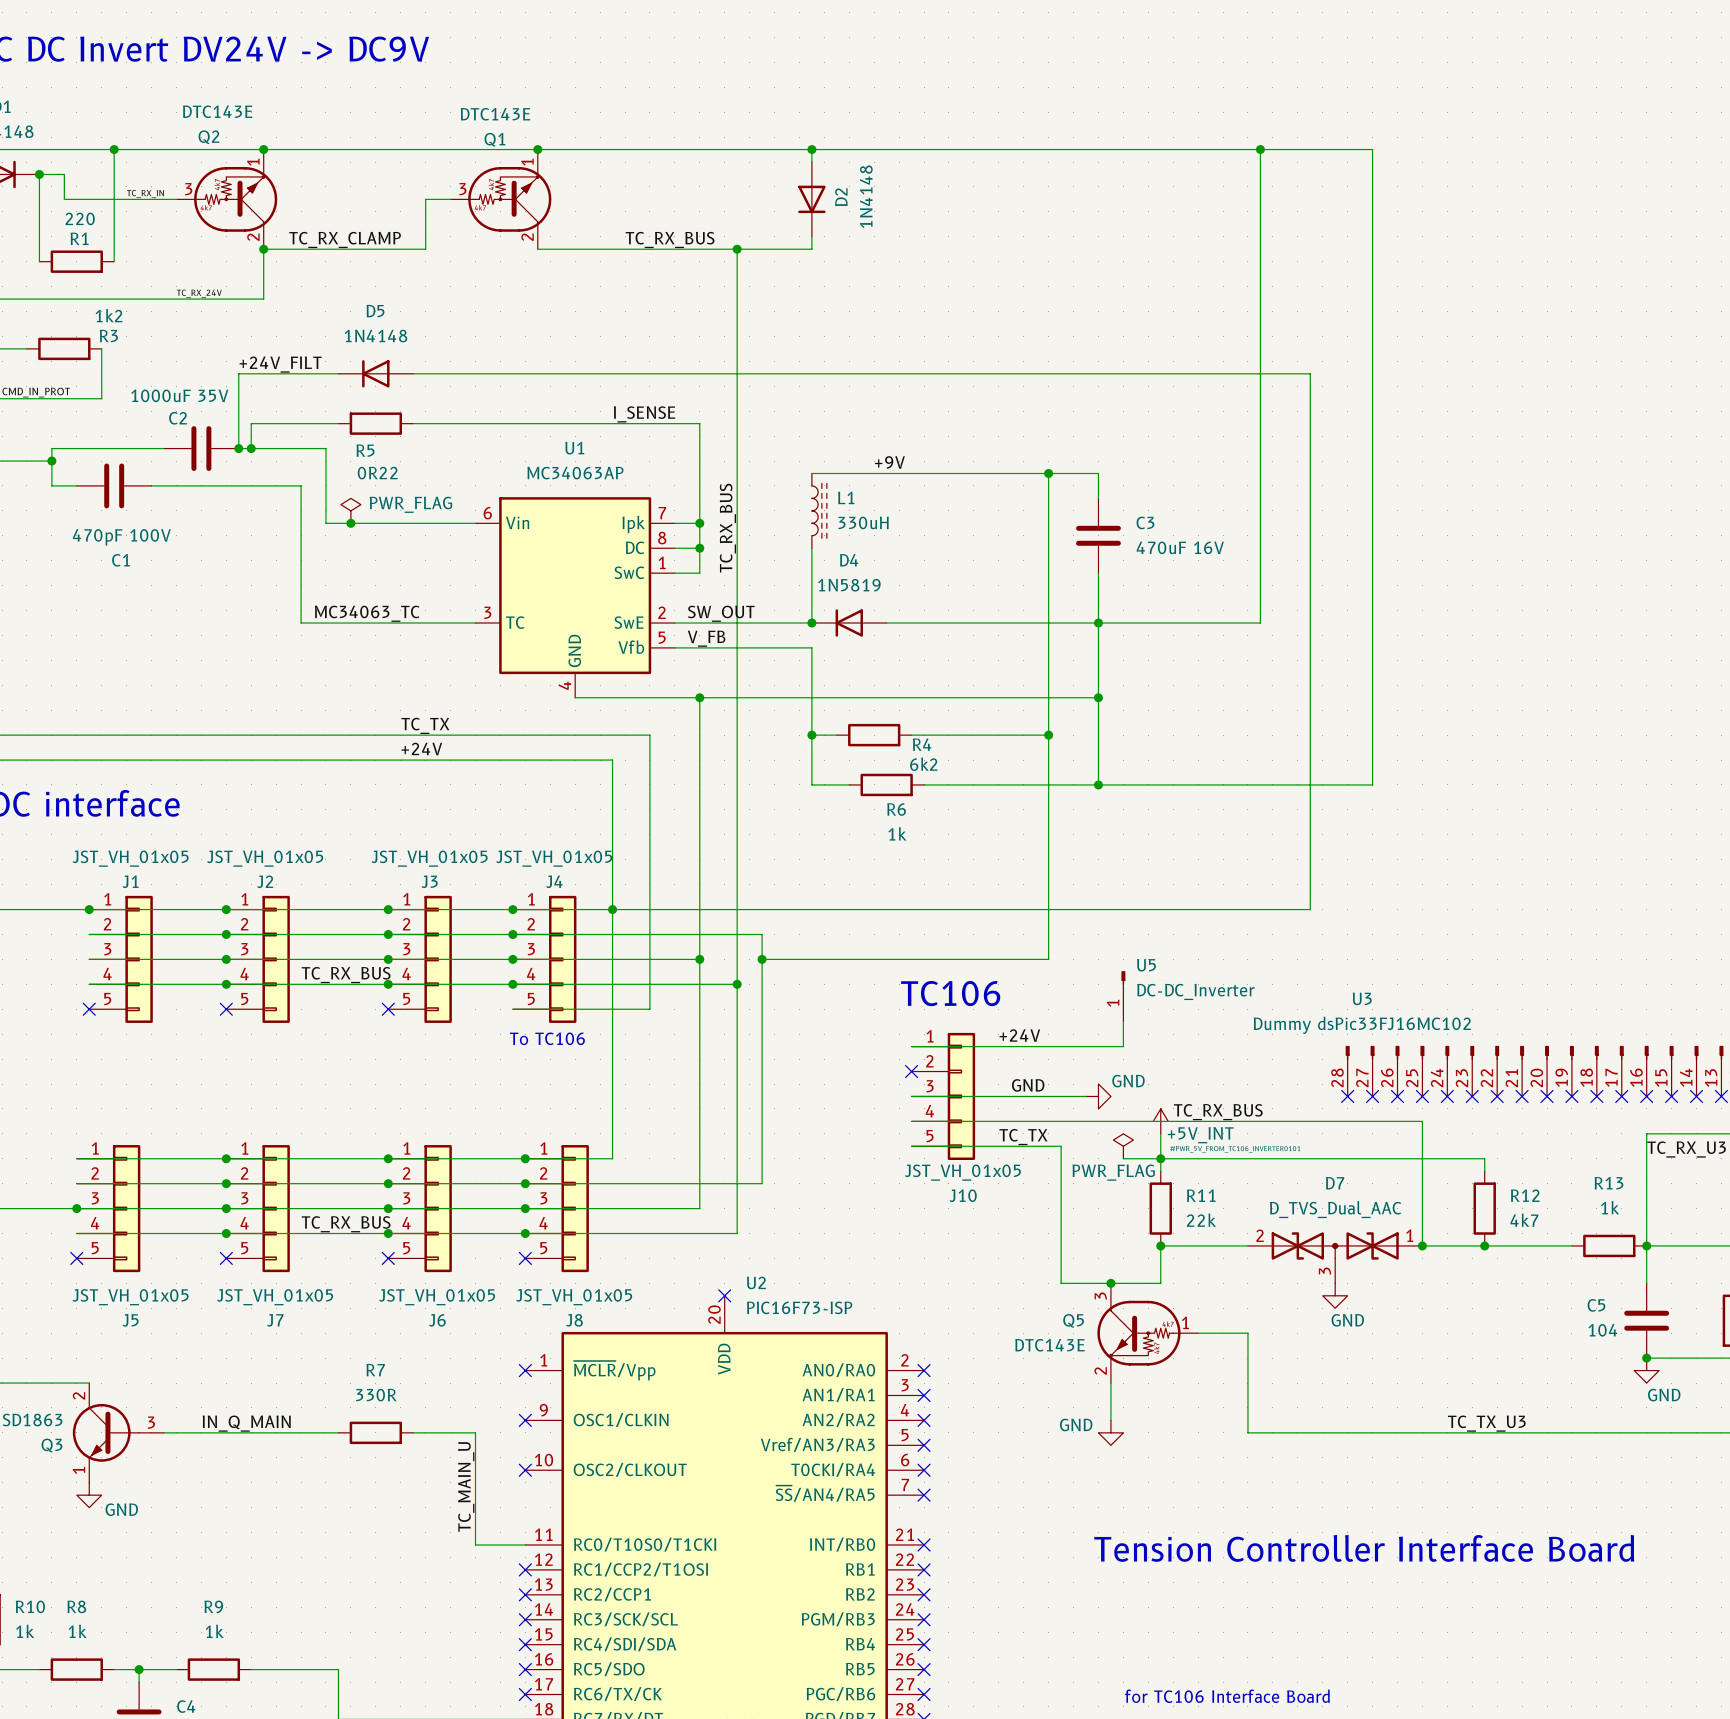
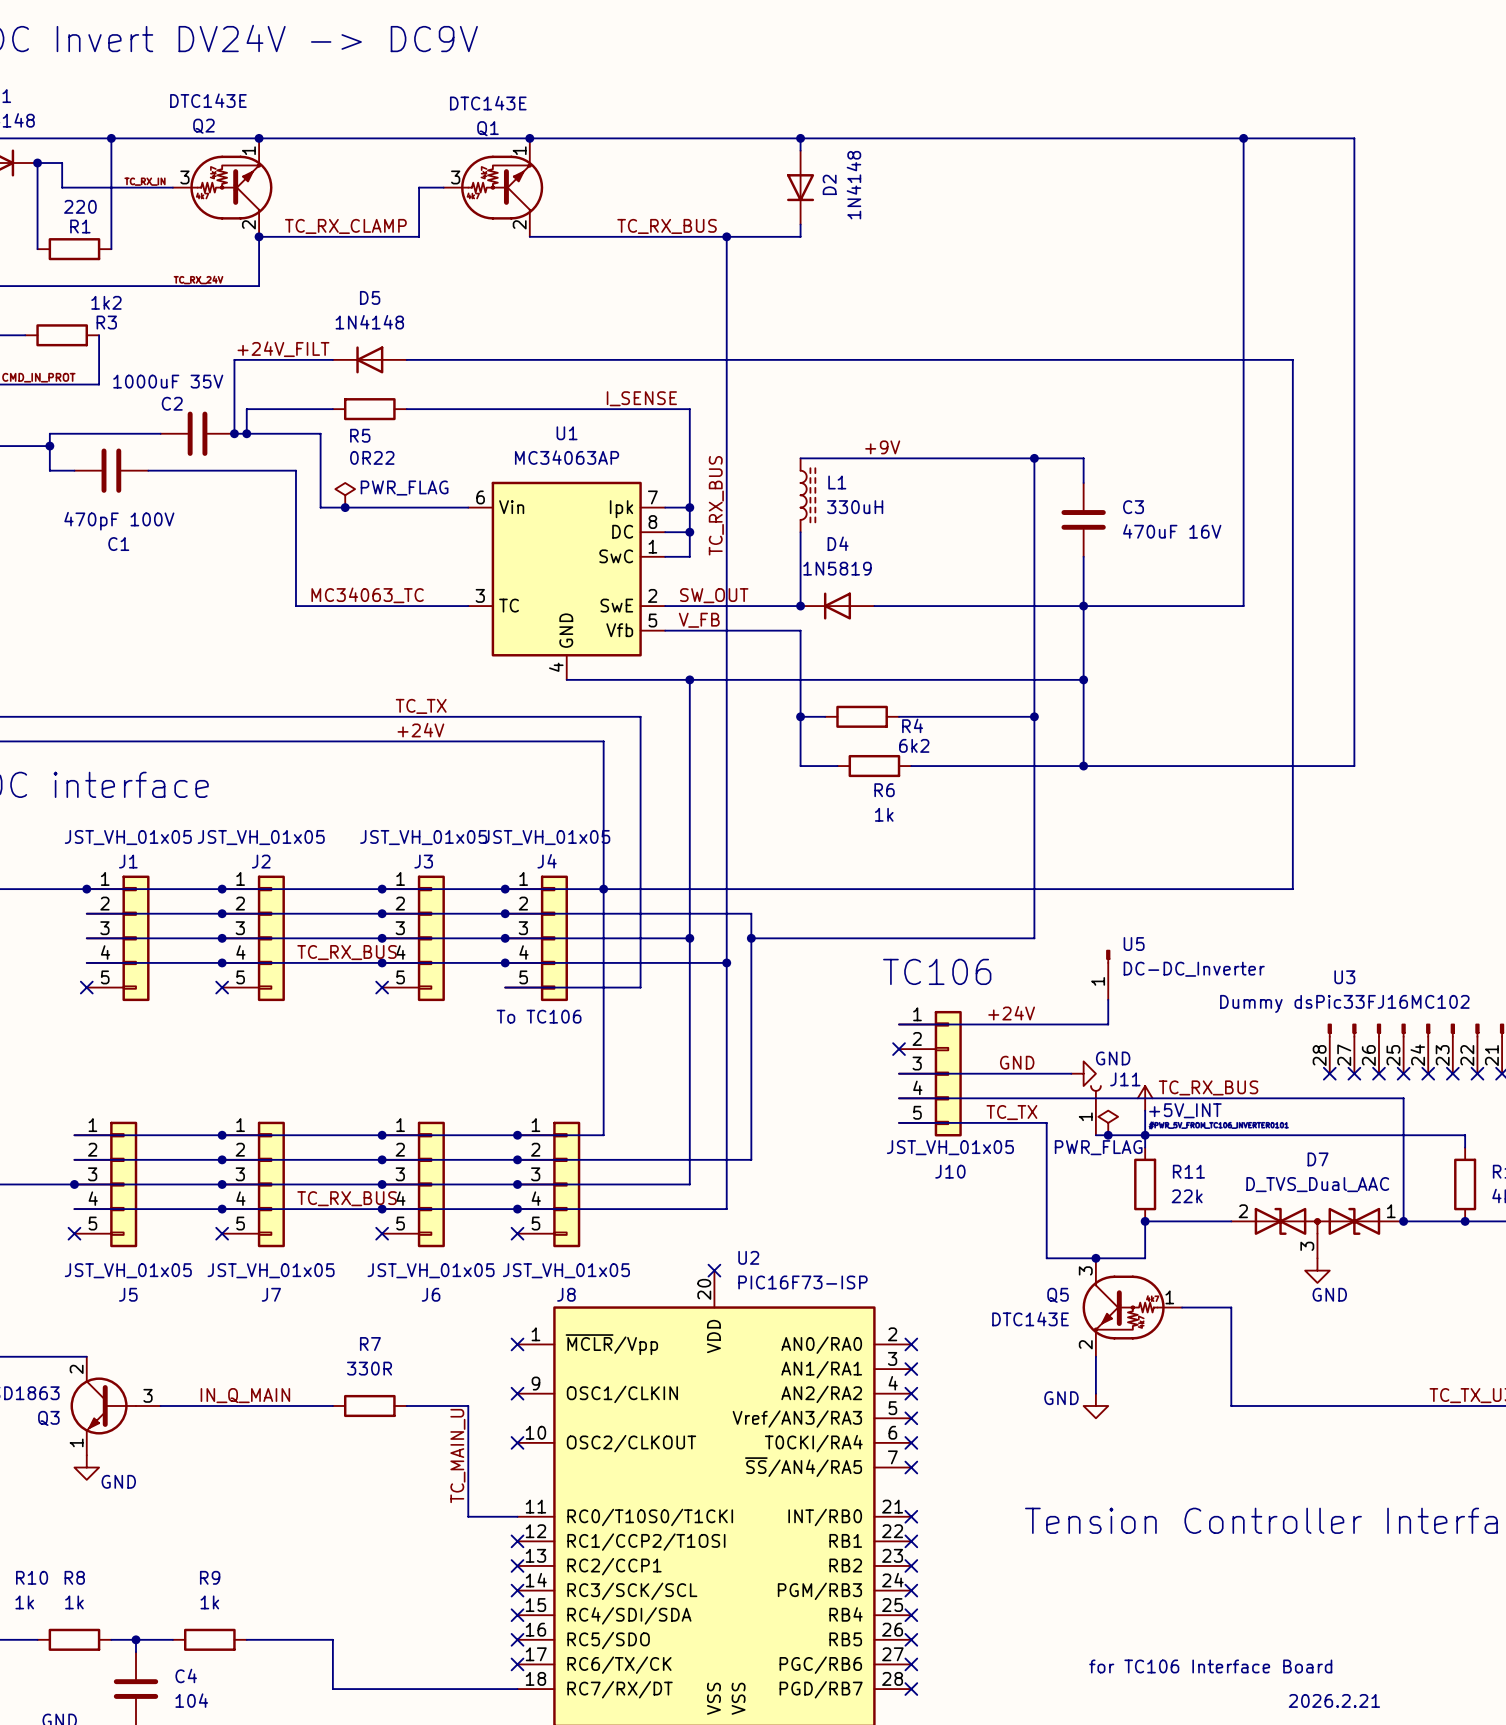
J11: none -> (1095, 1110)
wire: none -> (1095, 1135) (1108, 1135)
junction: none -> (1108, 1135)

